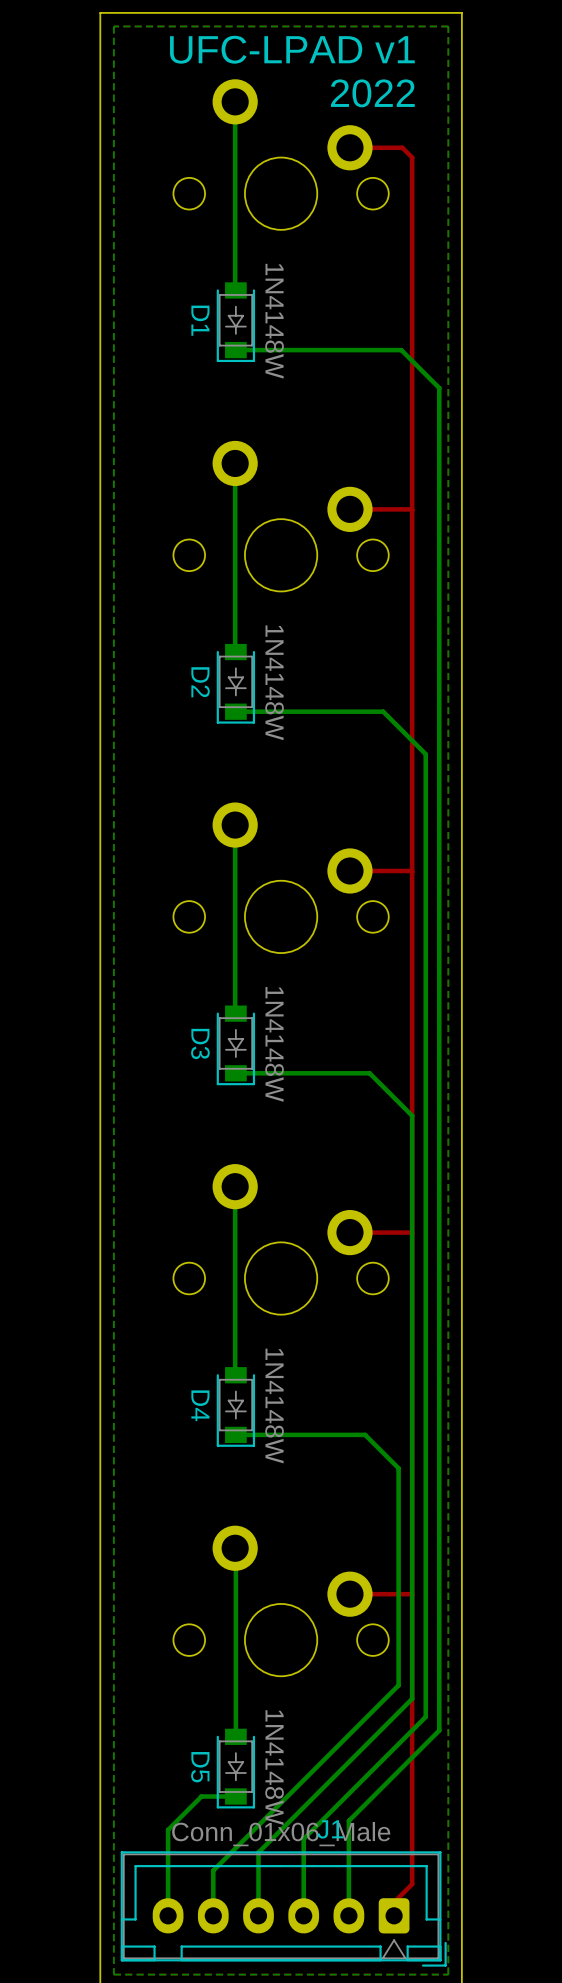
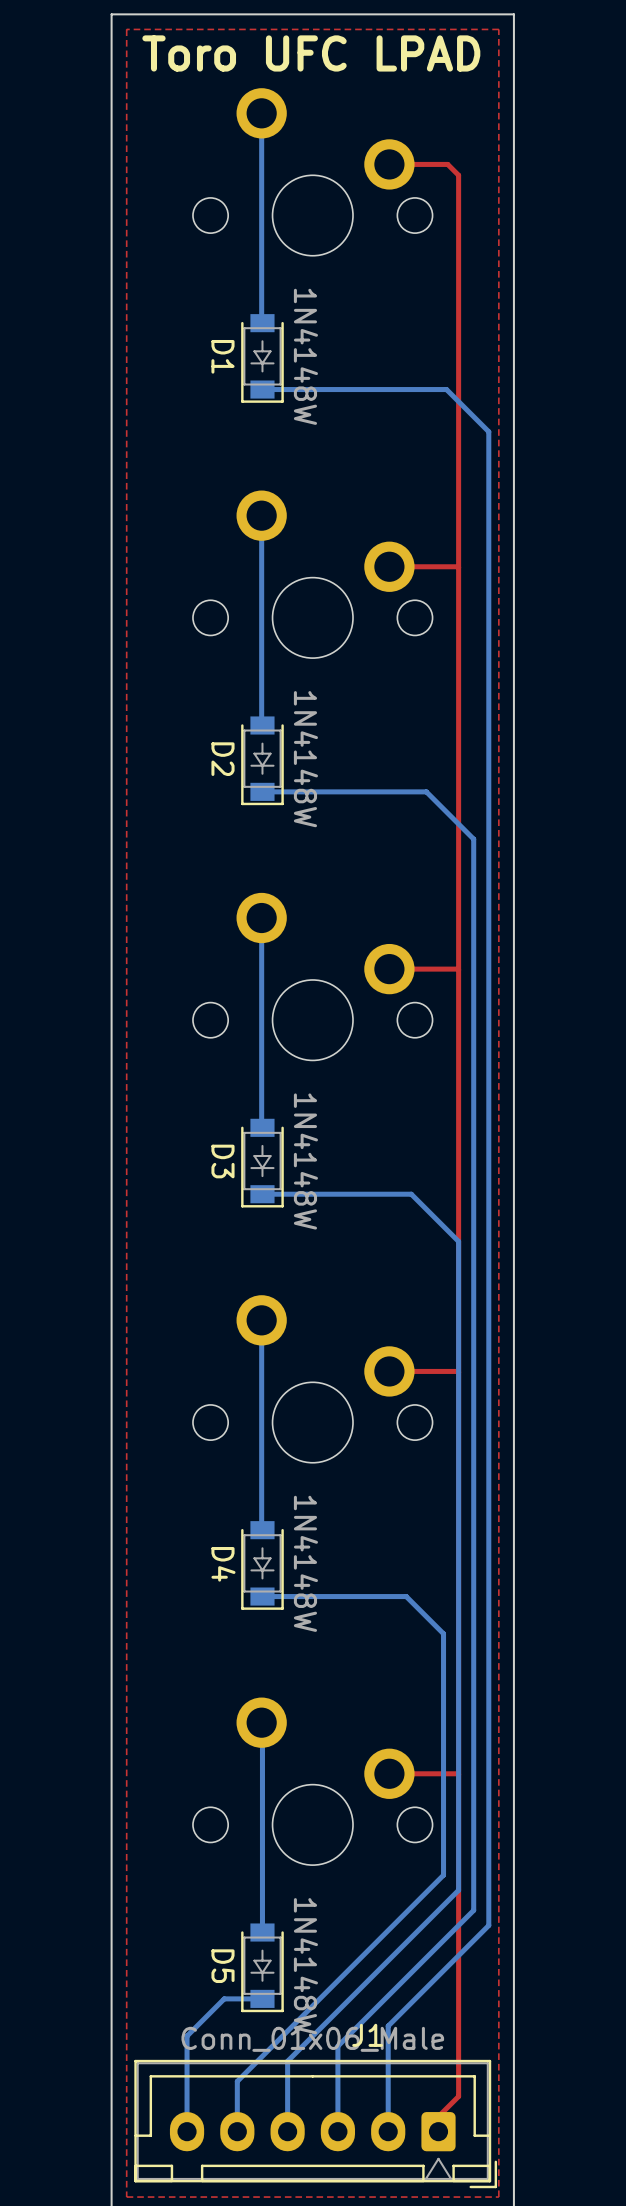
bottom zone outline: (448, 26) (448, 1974) (113, 1974) (113, 26) (448, 26) -> none
text: none -> Toro UFC LPAD (311, 53)
text: UFC-LPAD v1 (292, 49) -> none
text: 2022 (372, 93) -> none

